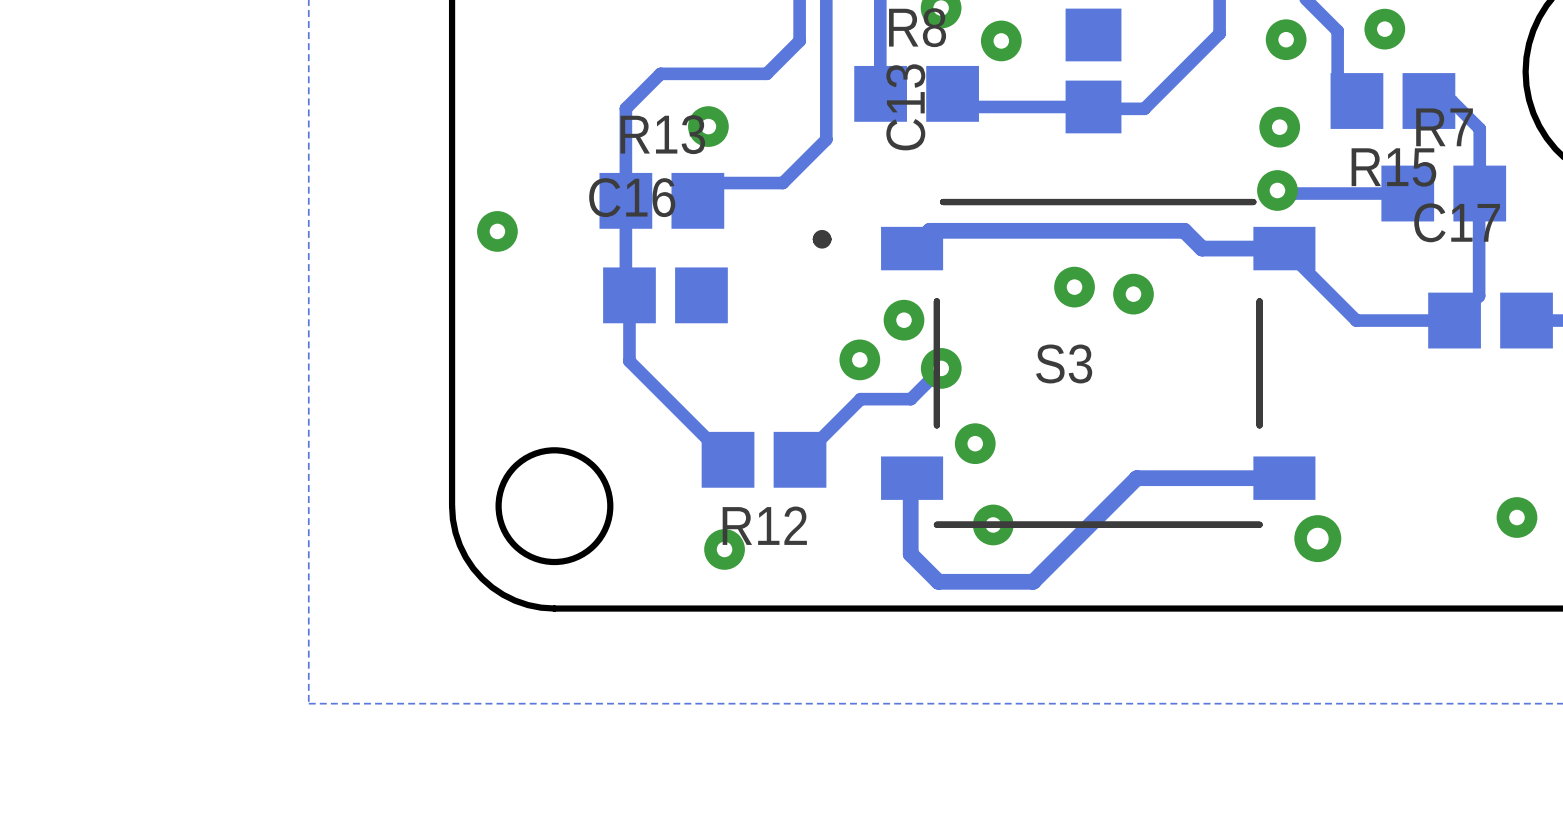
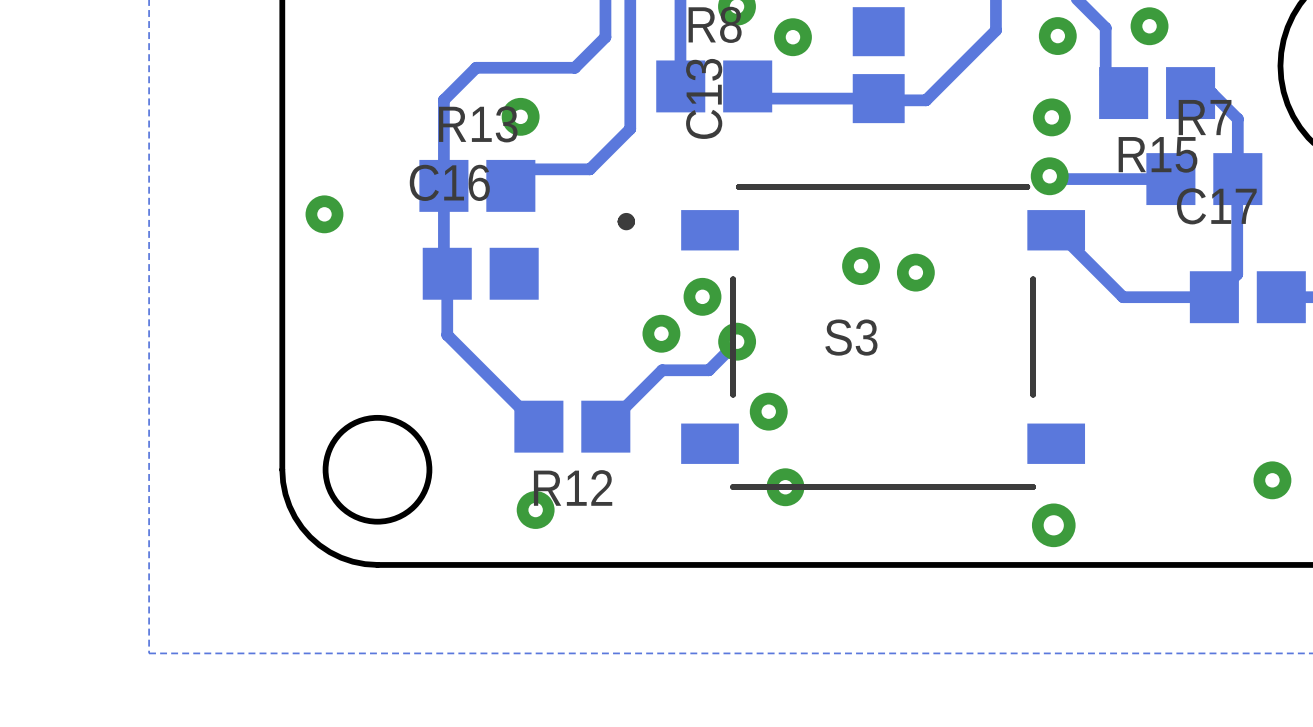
track: (1284, 248) (1202, 248) (1184, 230) (929, 230) (912, 248) -> none
track: (1284, 478) (1136, 478) (1033, 581) (938, 581) (910, 554) (912, 478) -> none
via position: (1317, 538) -> (1053, 525)

